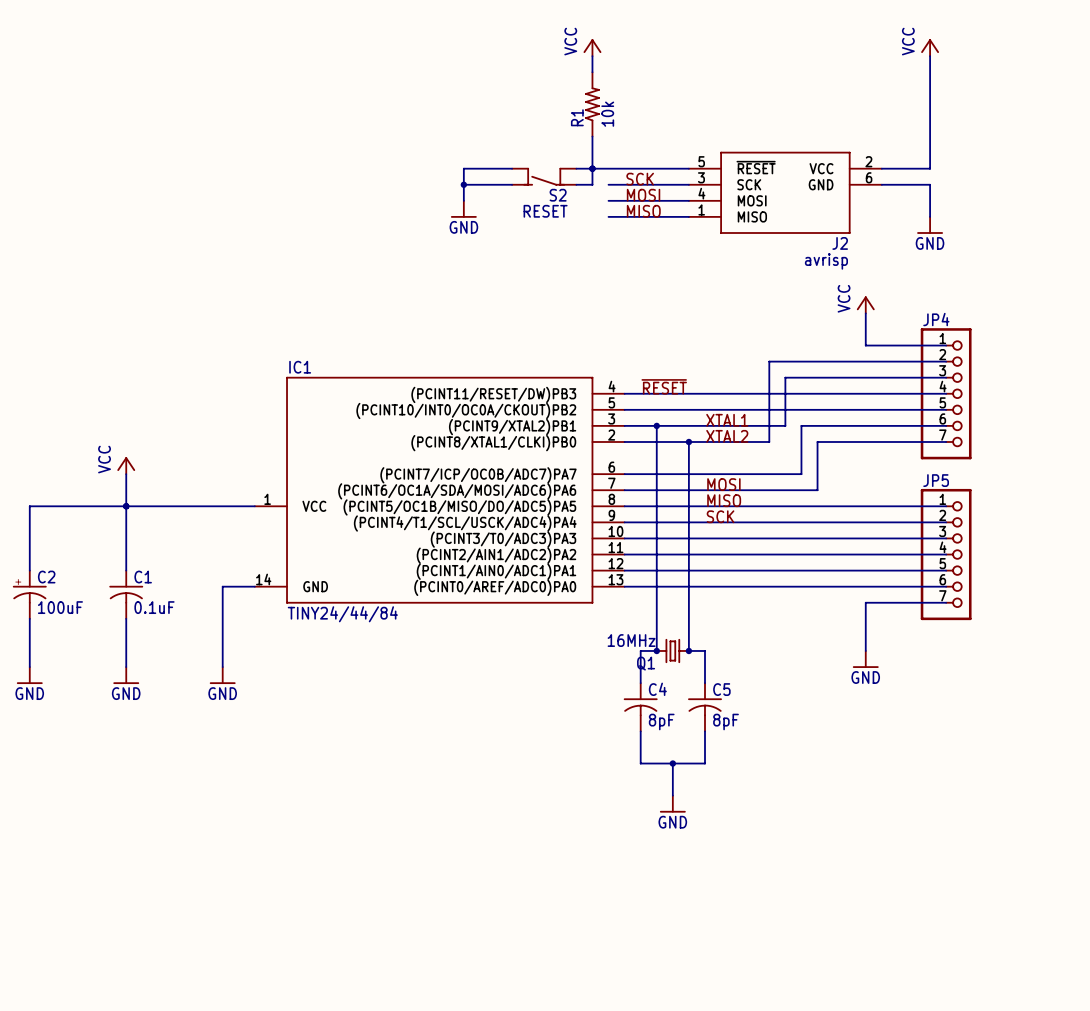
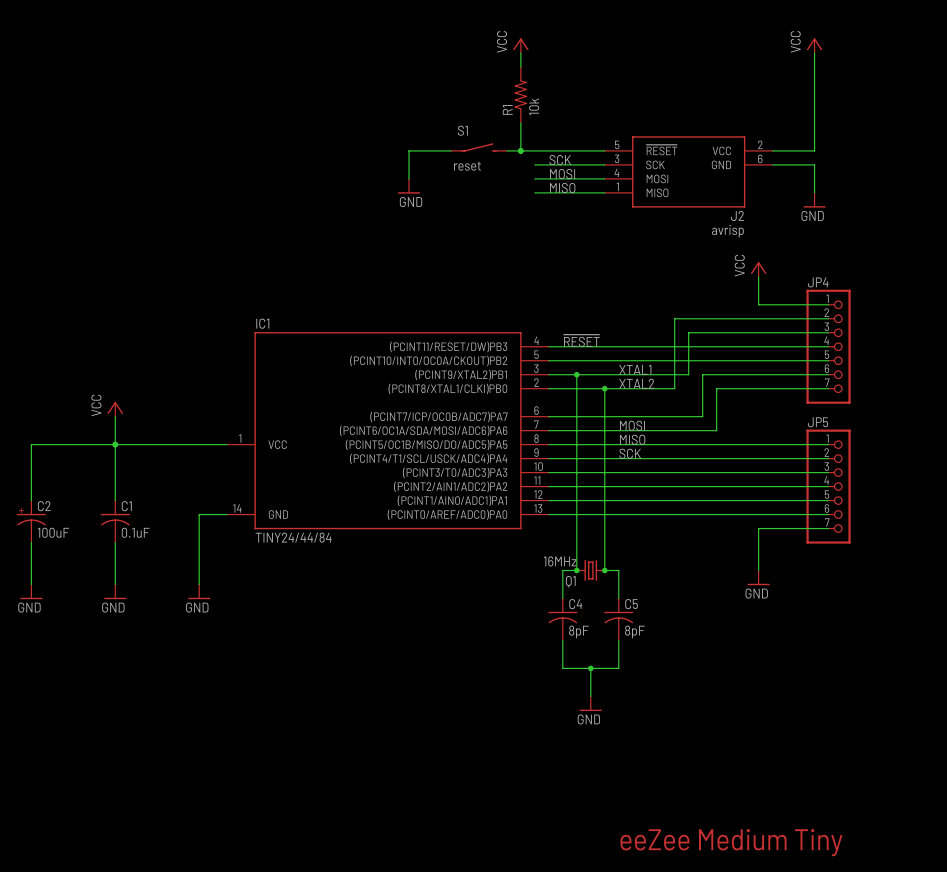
S1: none -> reset (478, 147)
wire: (592, 168) (592, 184) (576, 184) -> none
S2: RESET (544, 176) -> none
wire: (463, 184) (512, 184) -> none
junction: (463, 184) -> none
text: none -> eeZee Medium Tiny (731, 842)

